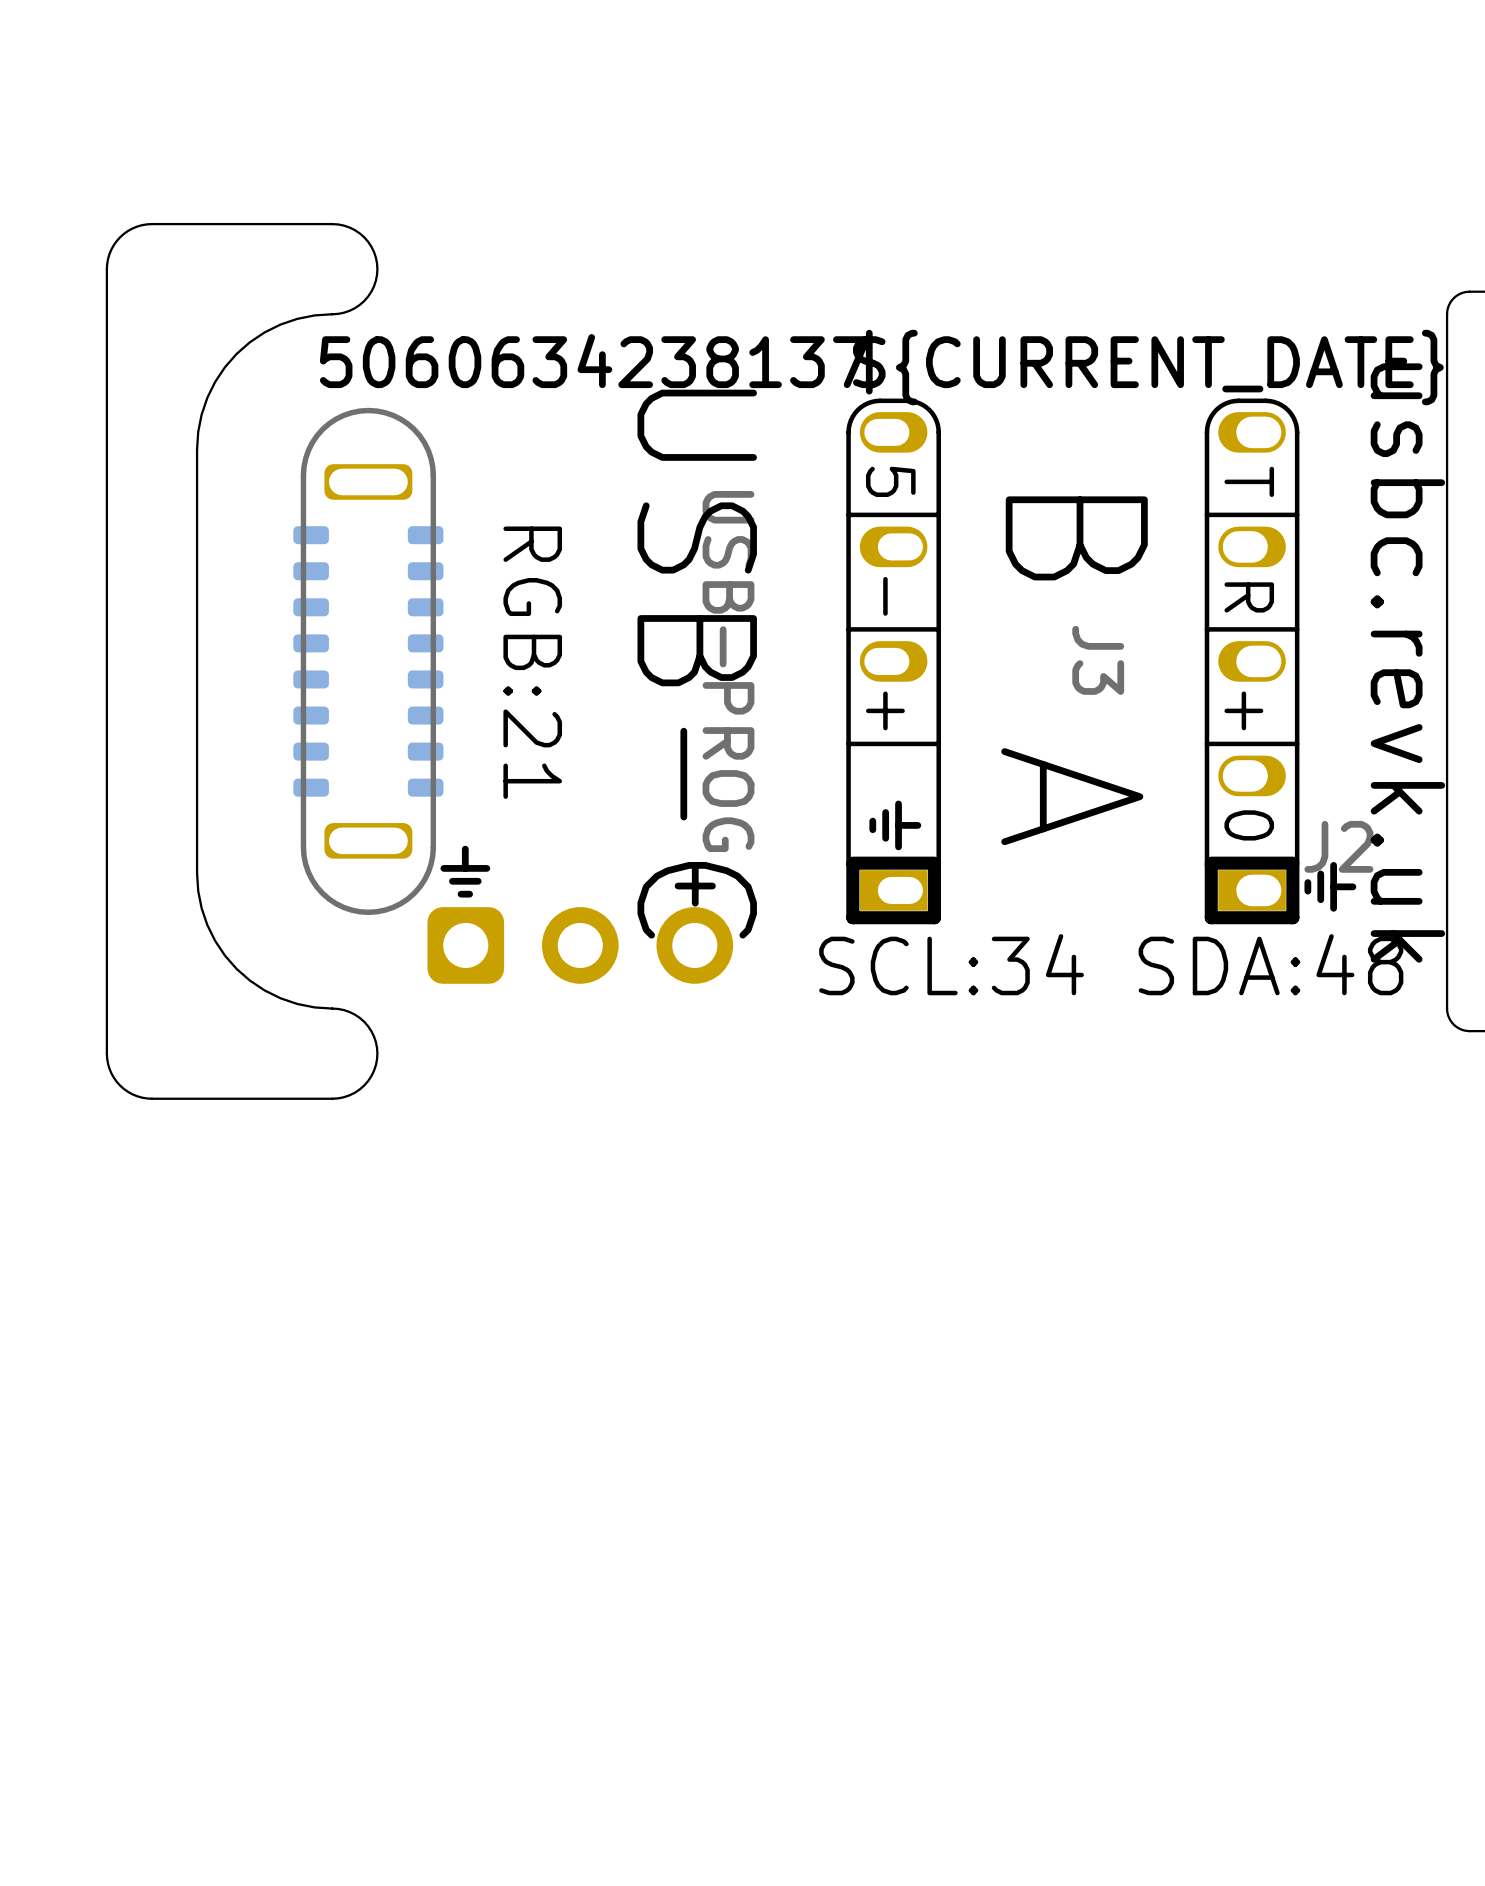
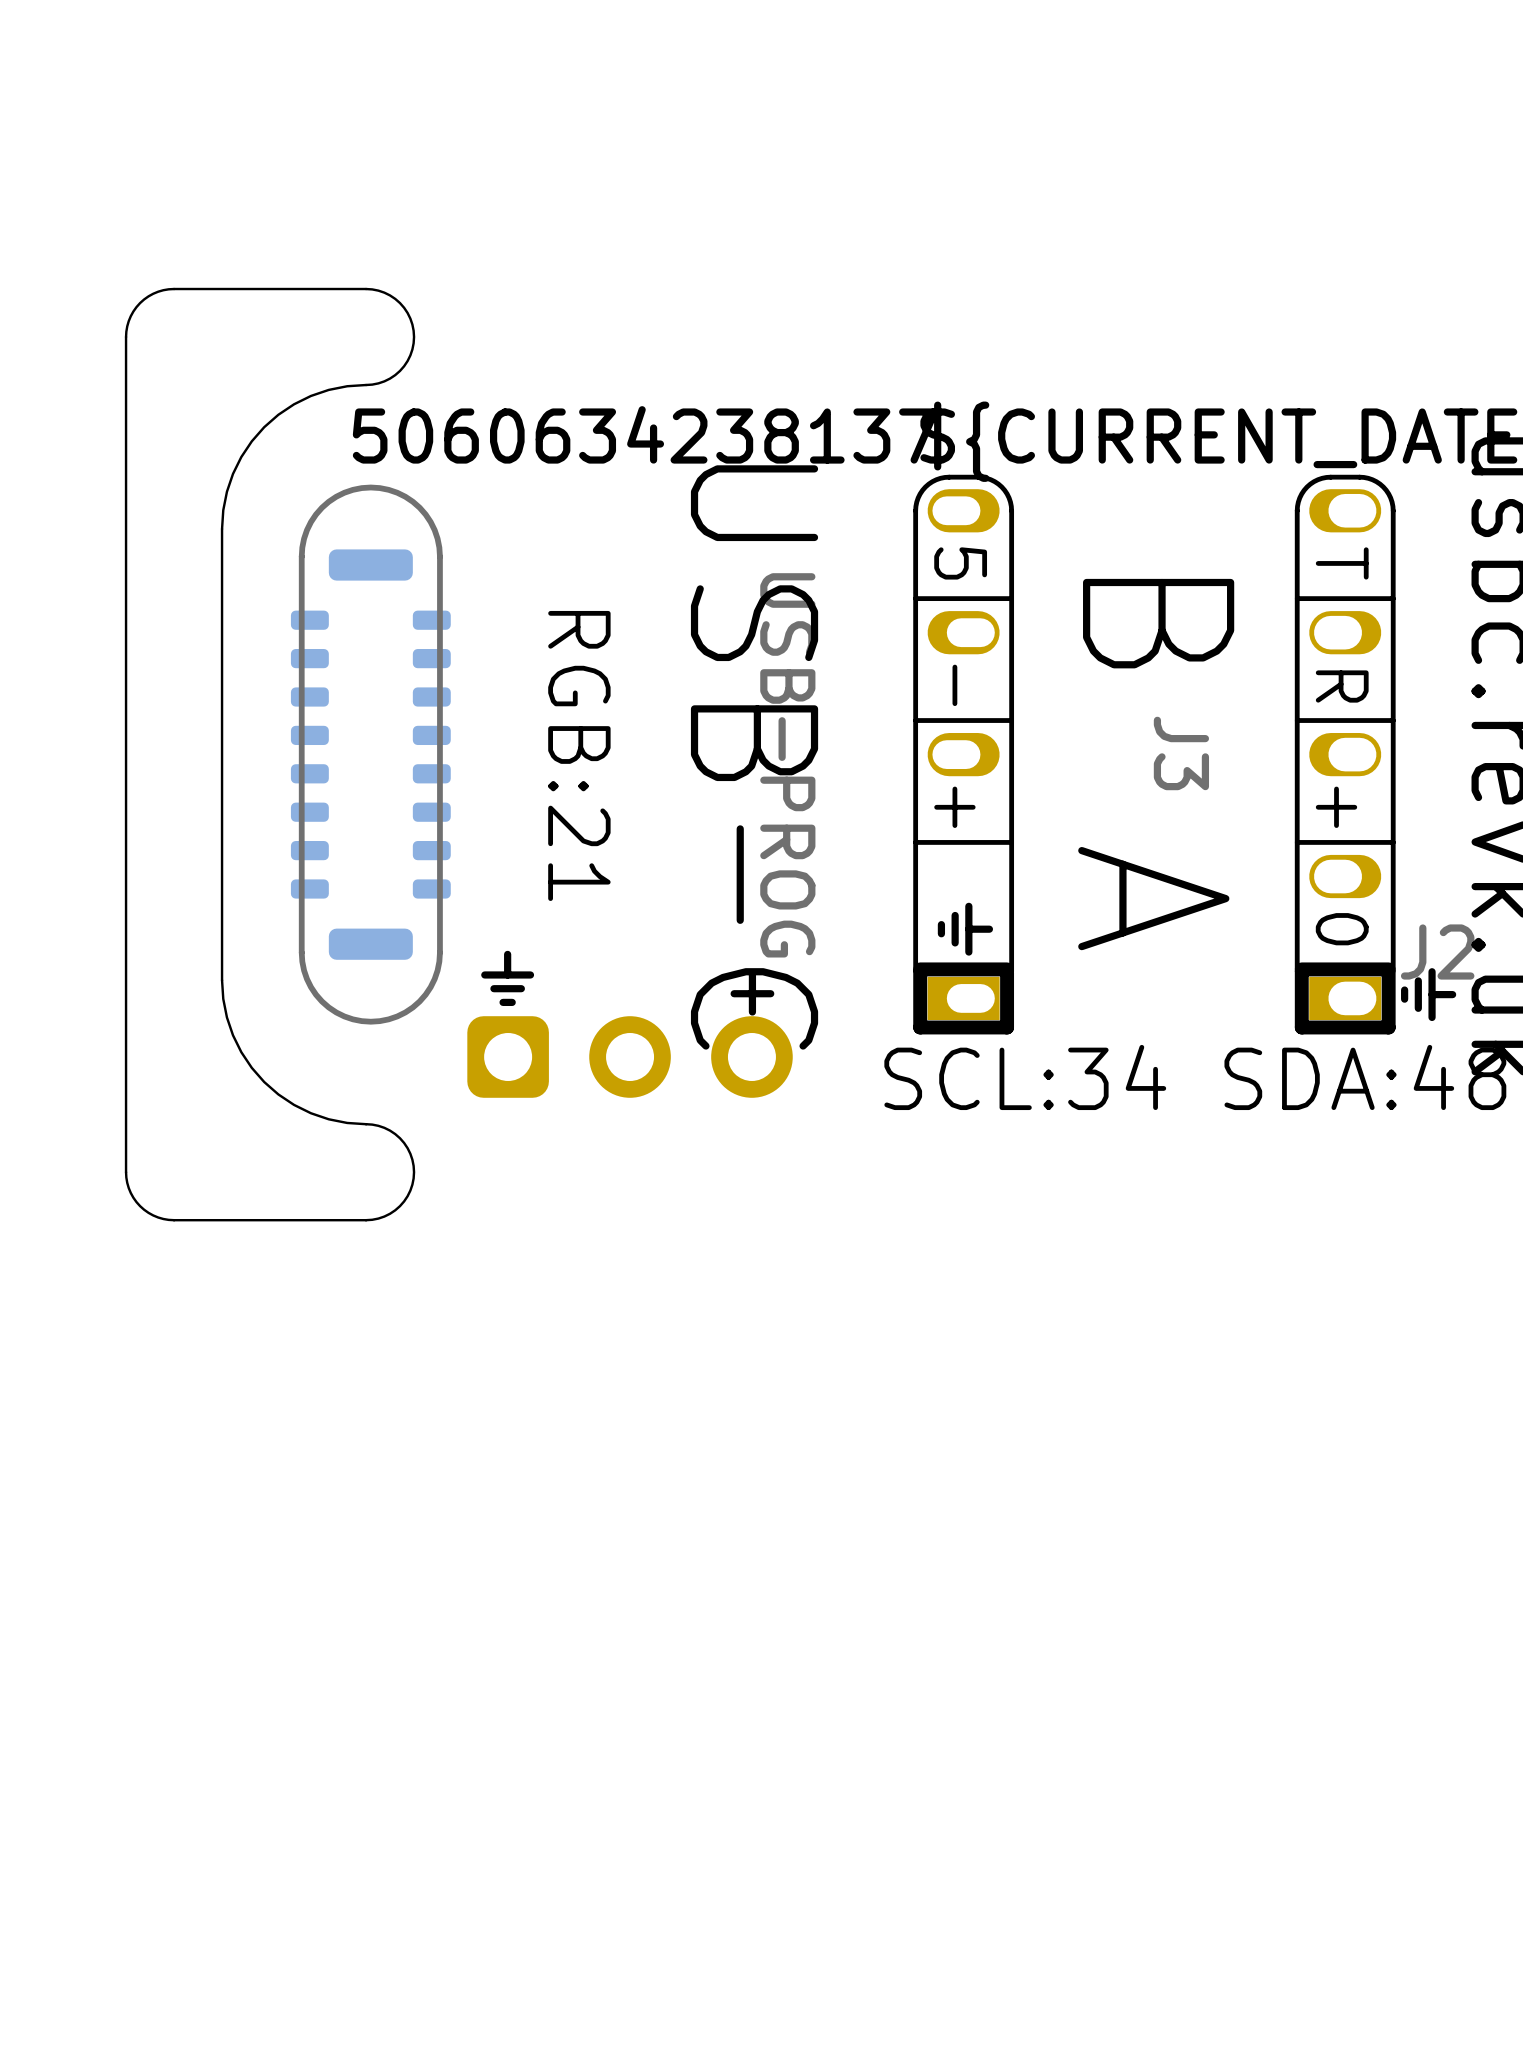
part footprint: [293, 407, 444, 916] -> [290, 484, 451, 1025]

